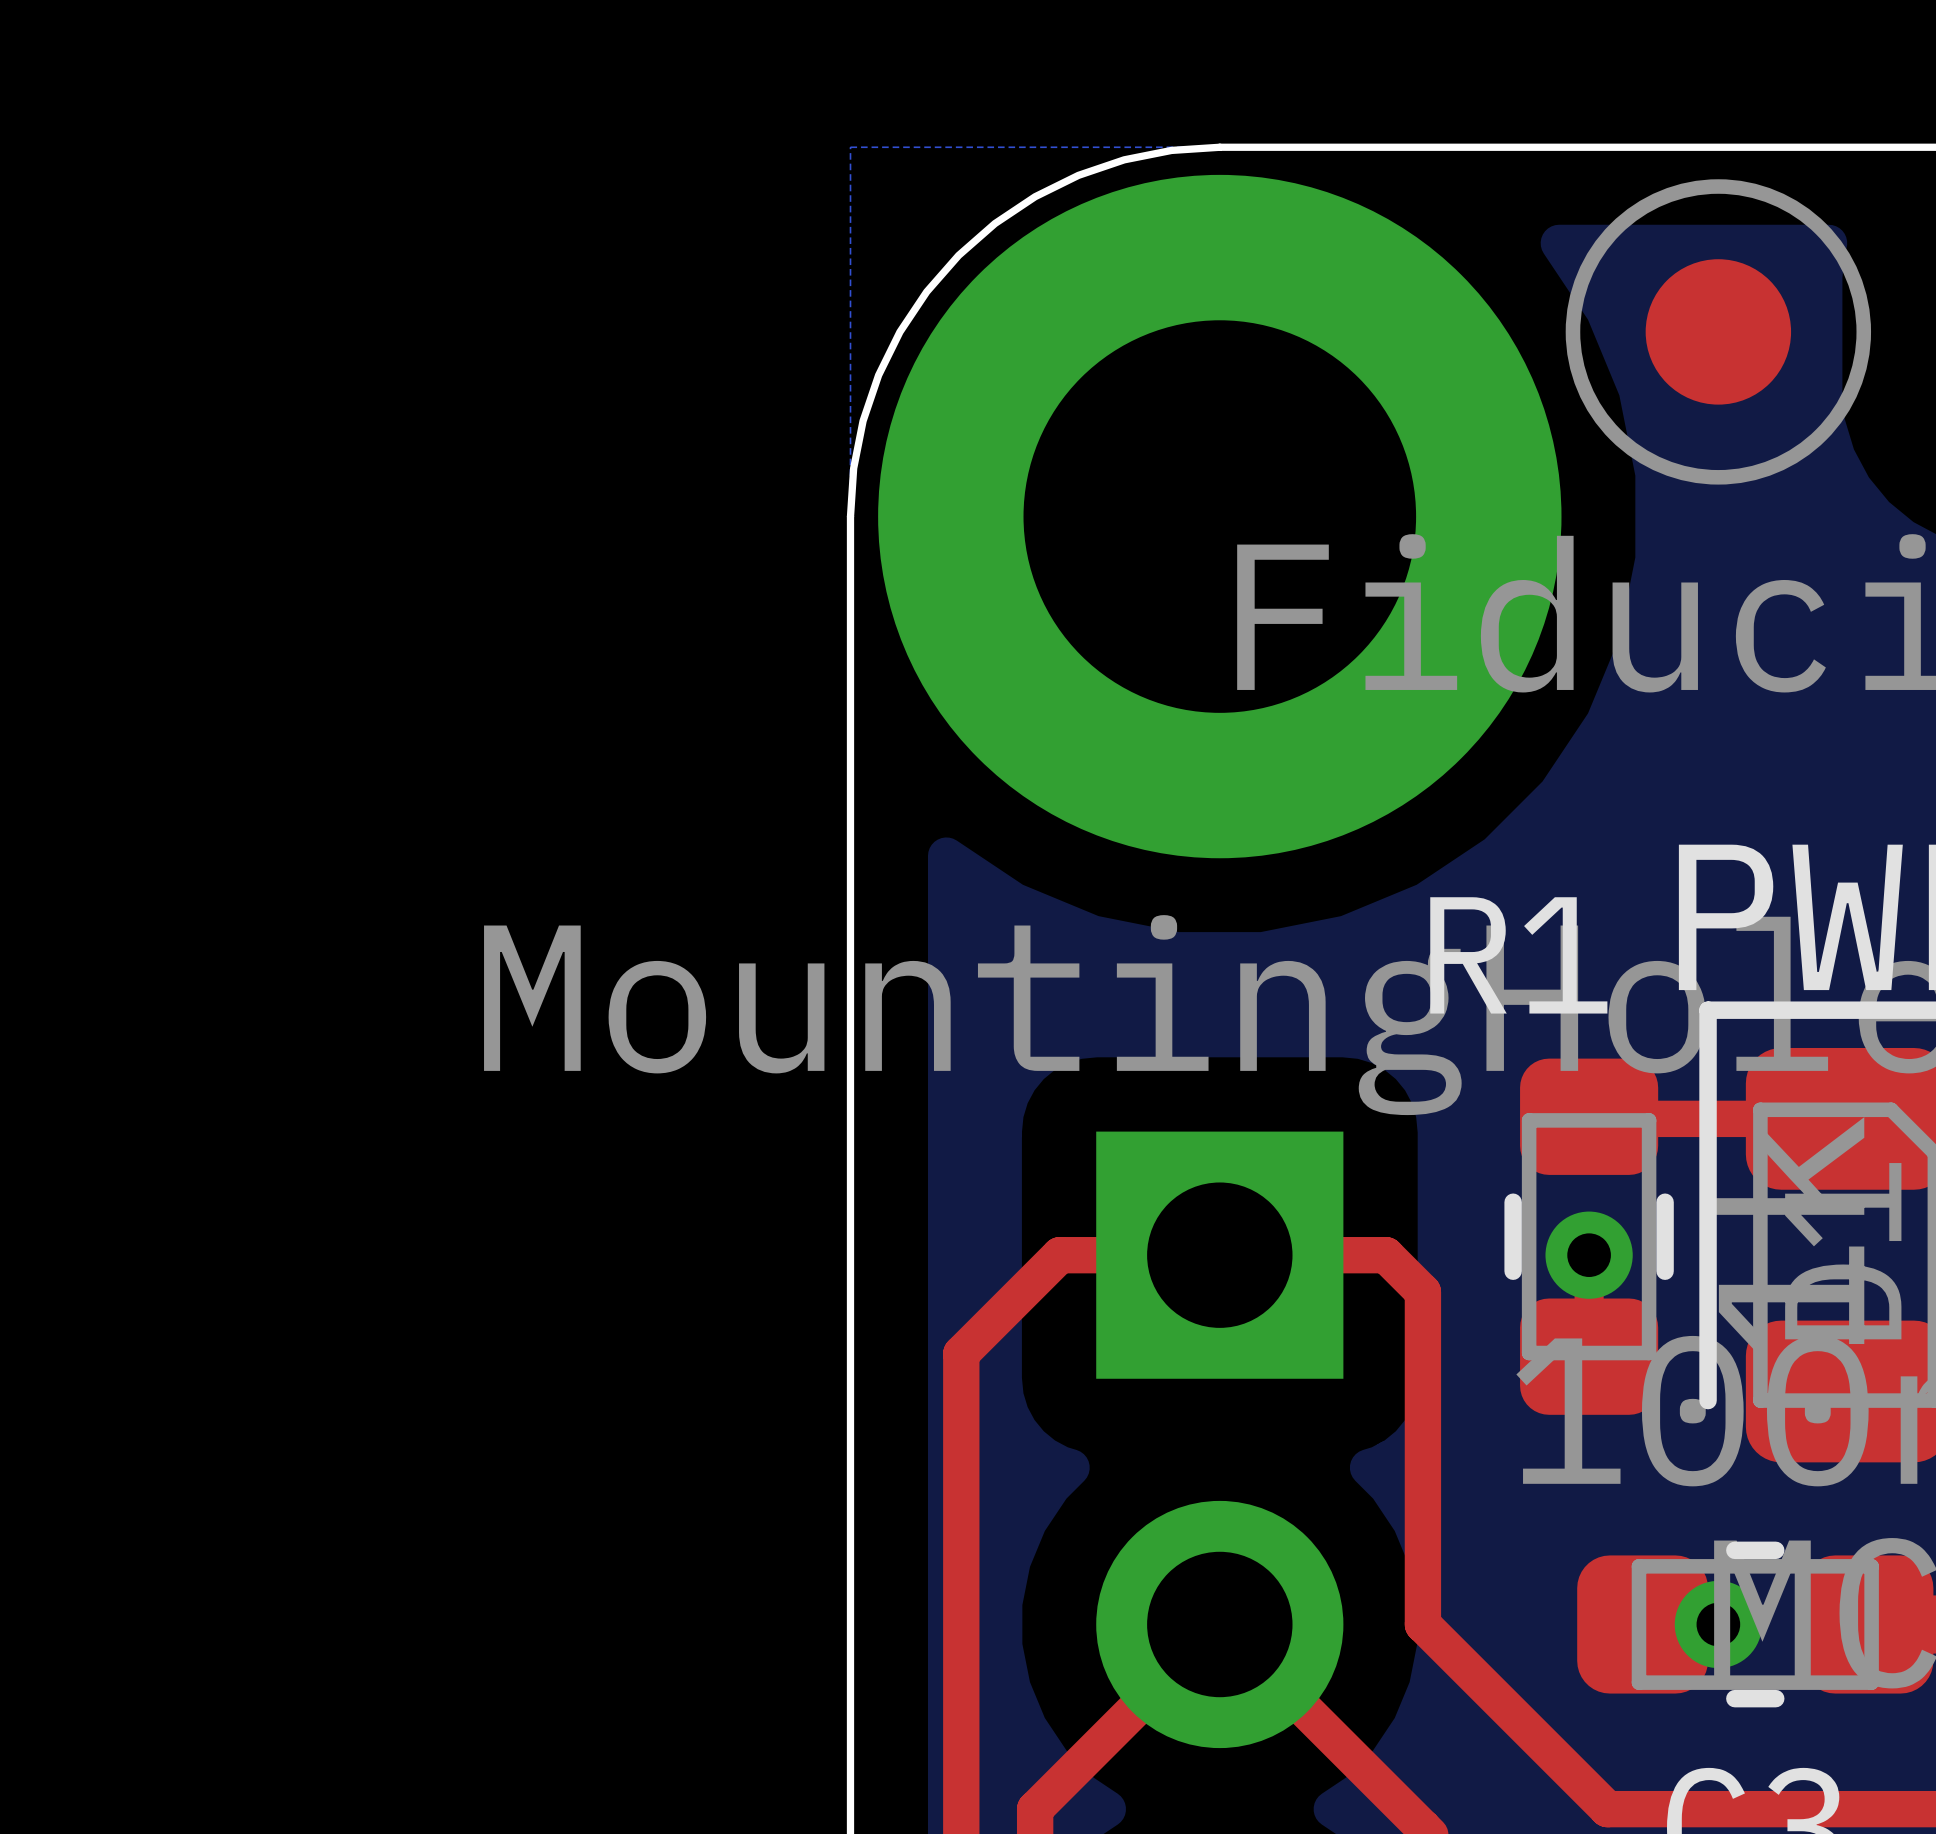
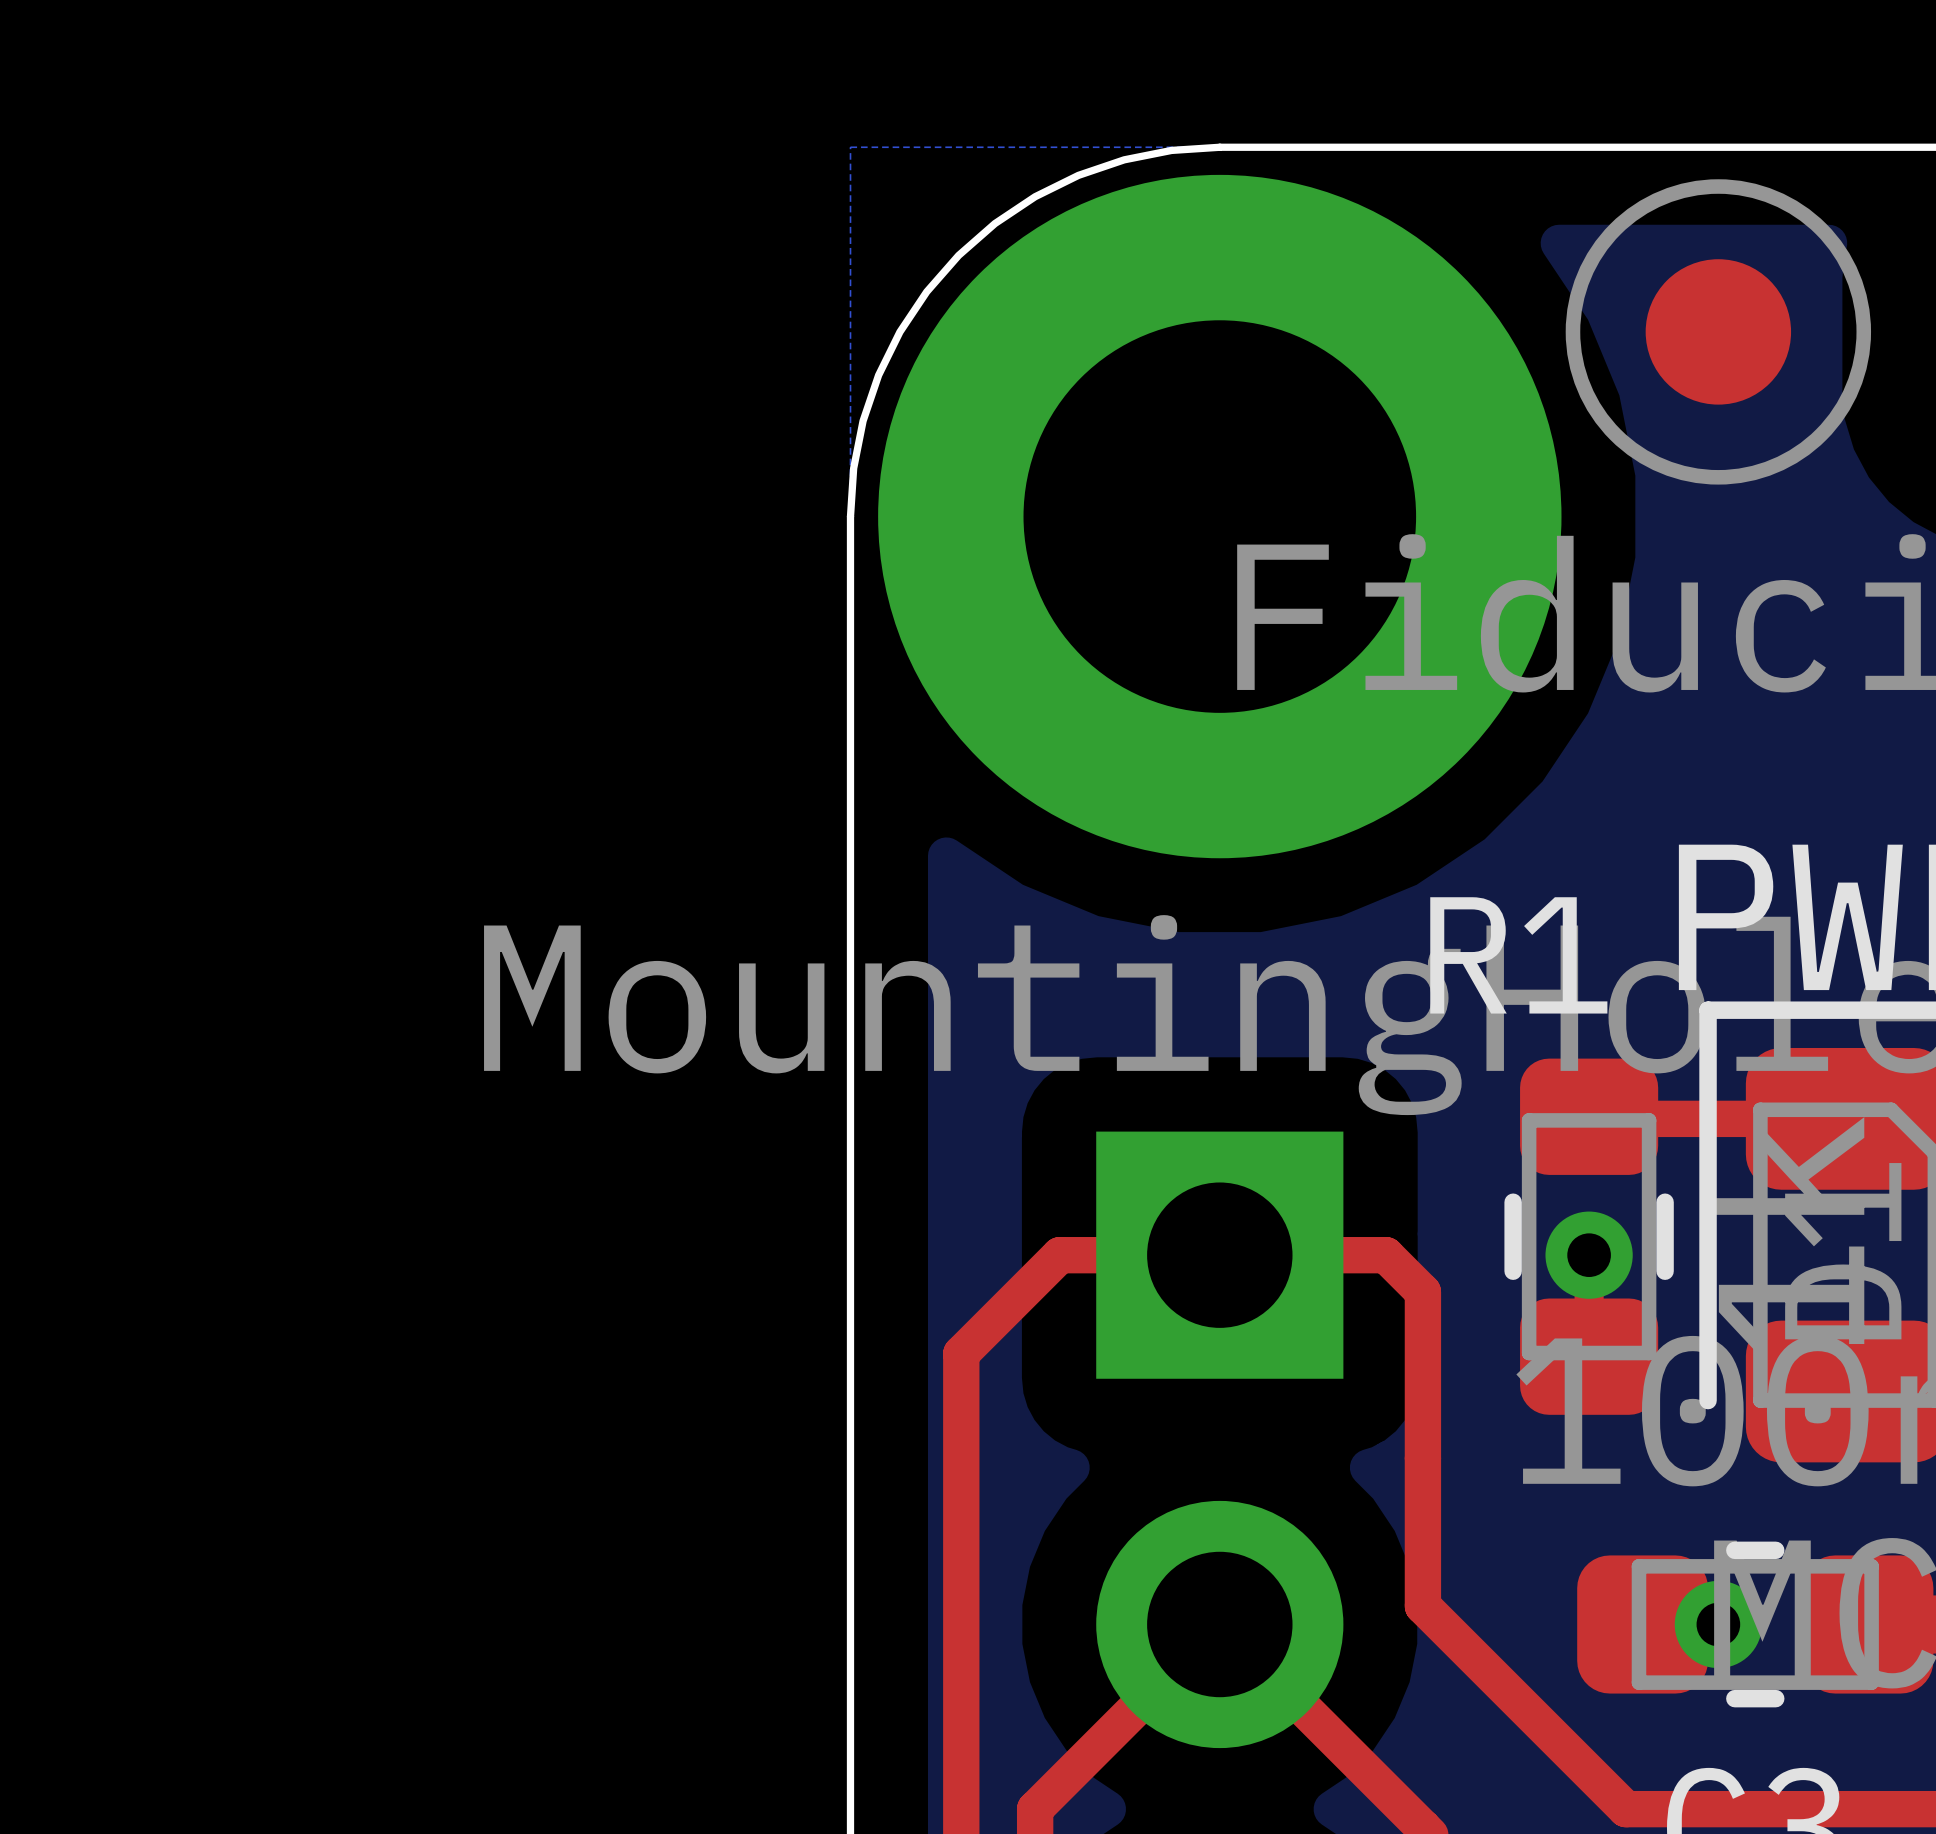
top track: (1422, 1606) (1422, 1624) (1607, 1809) (1626, 1809) -> (1422, 1606) (1626, 1809)

